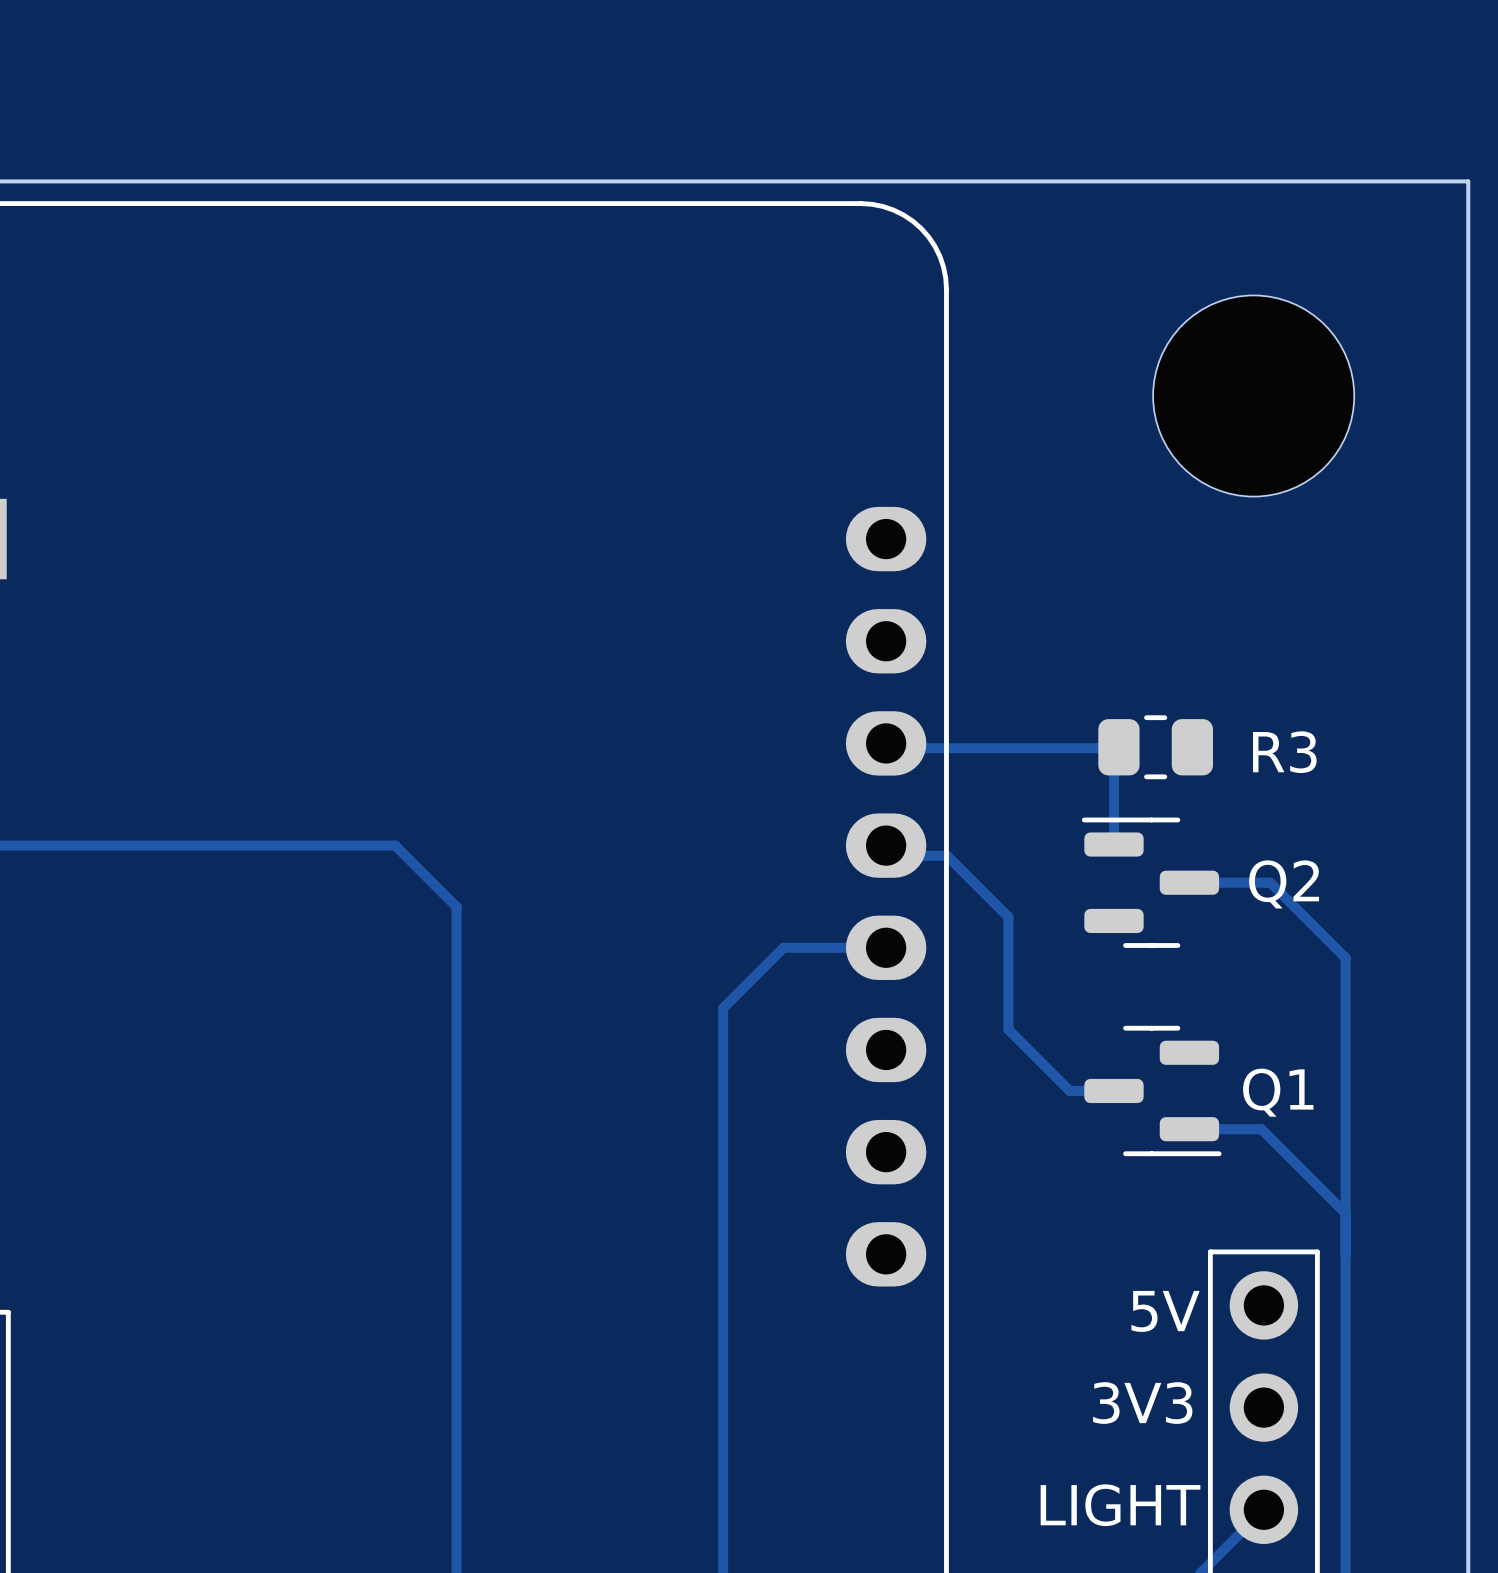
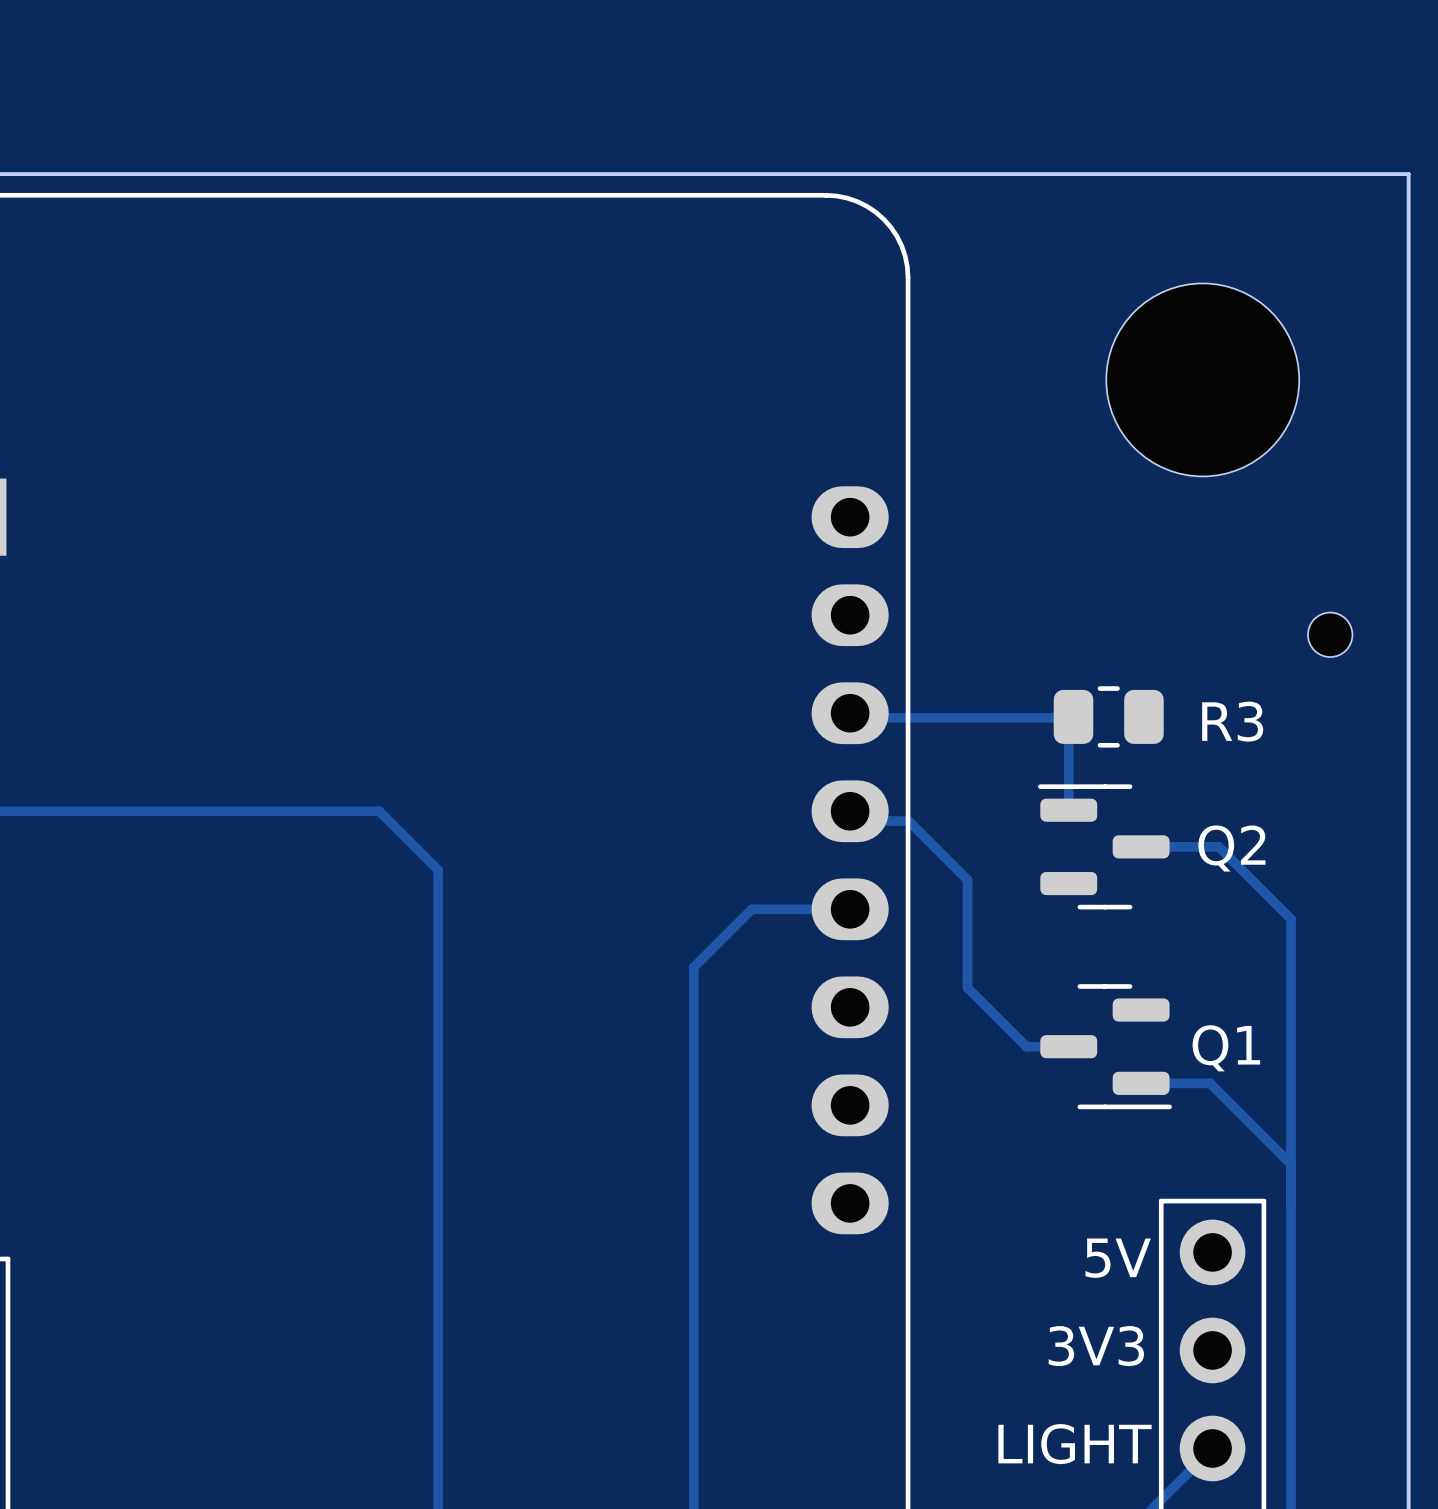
part: none -> (1330, 634)

